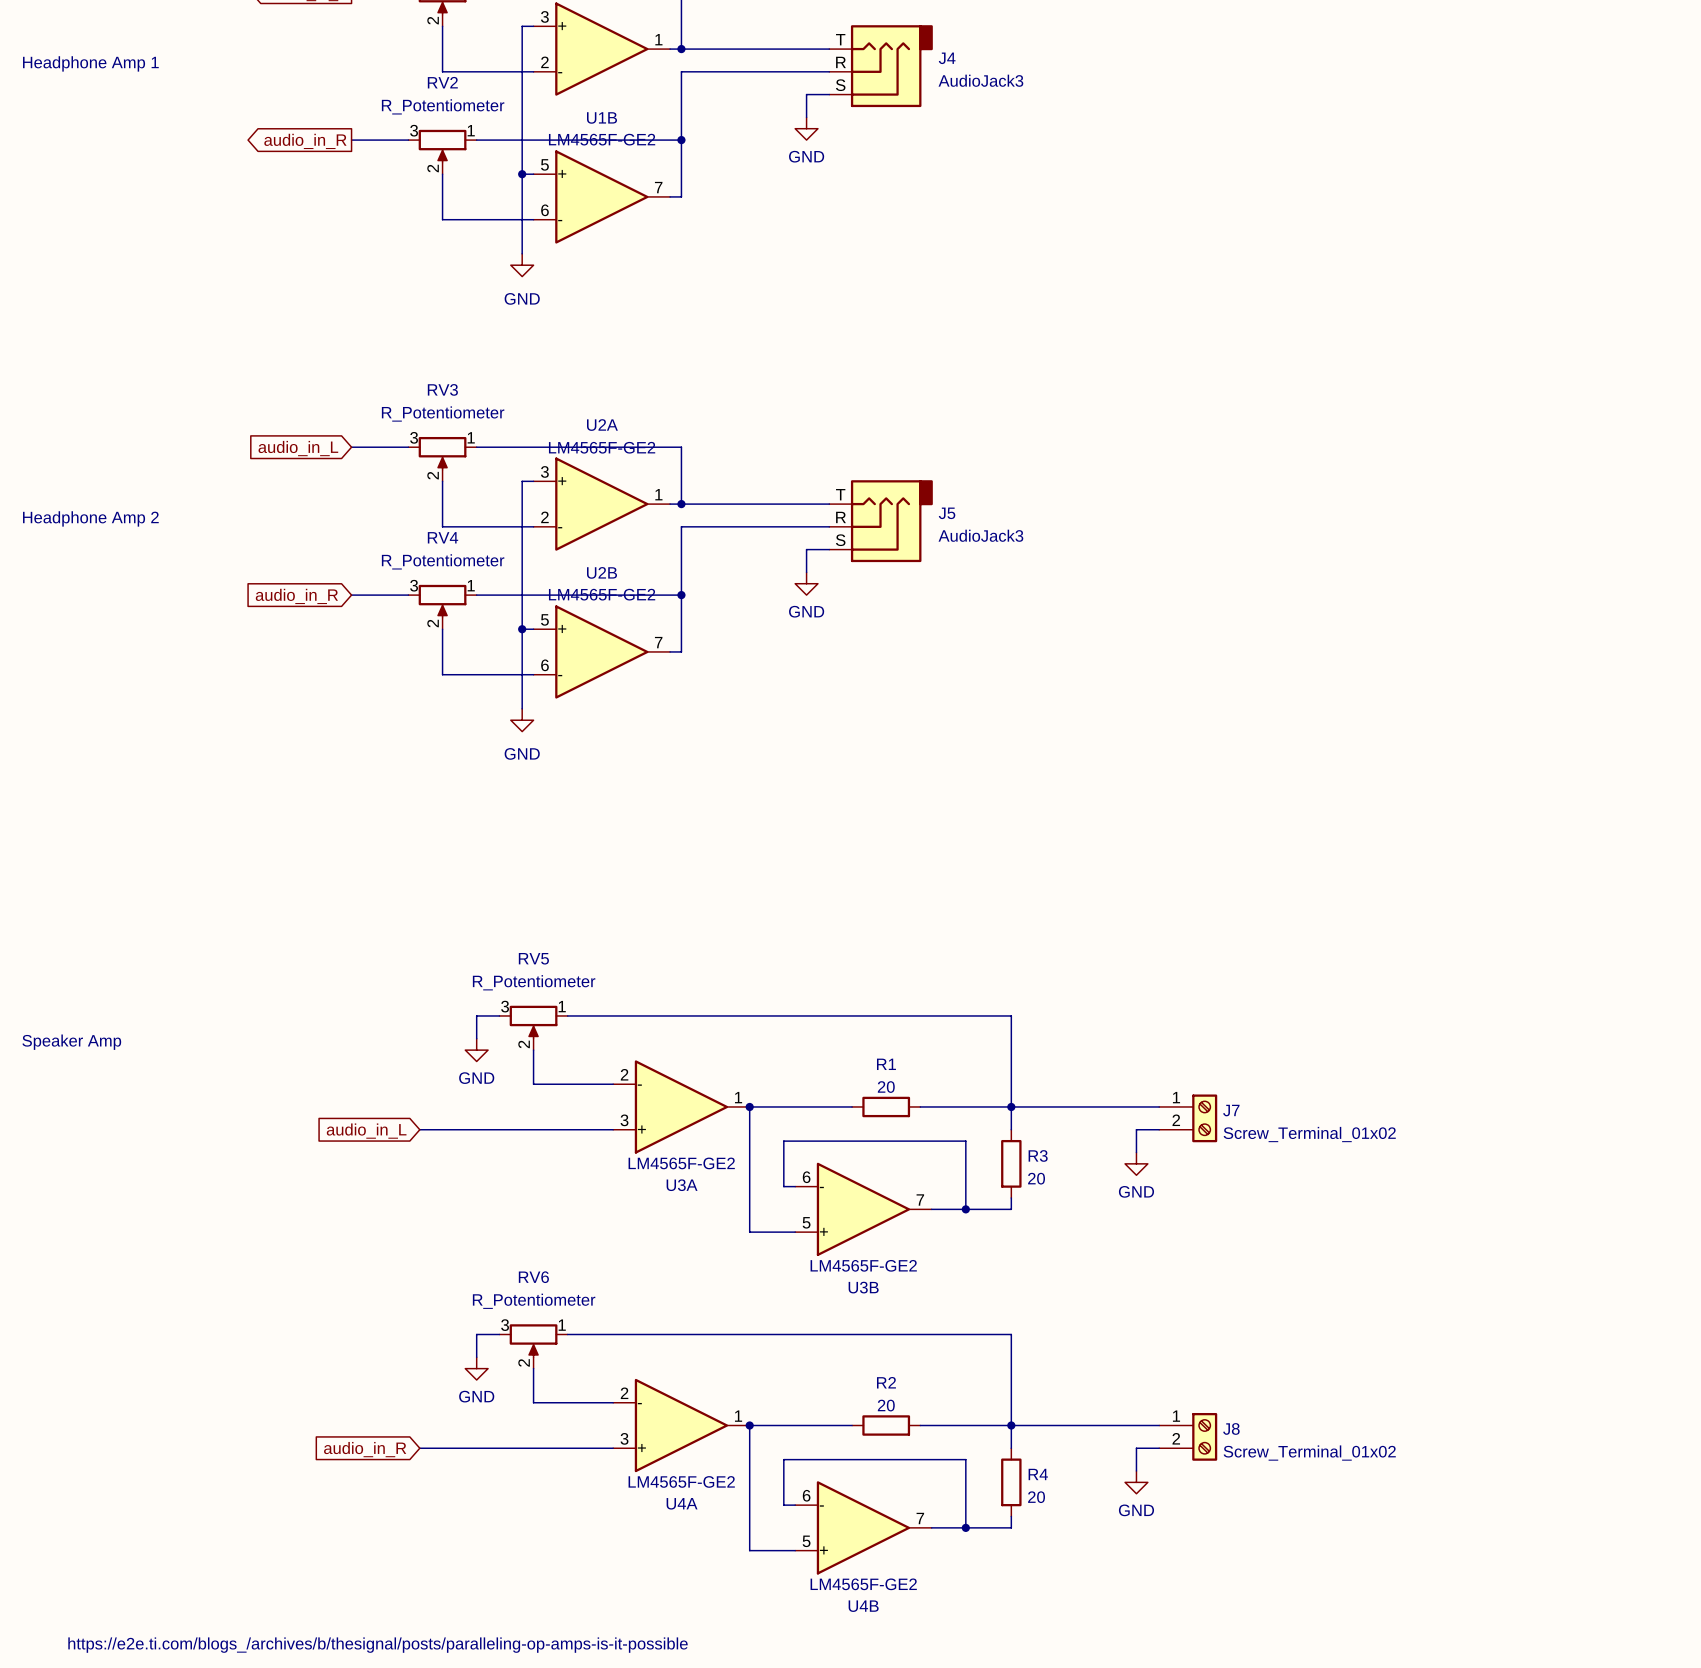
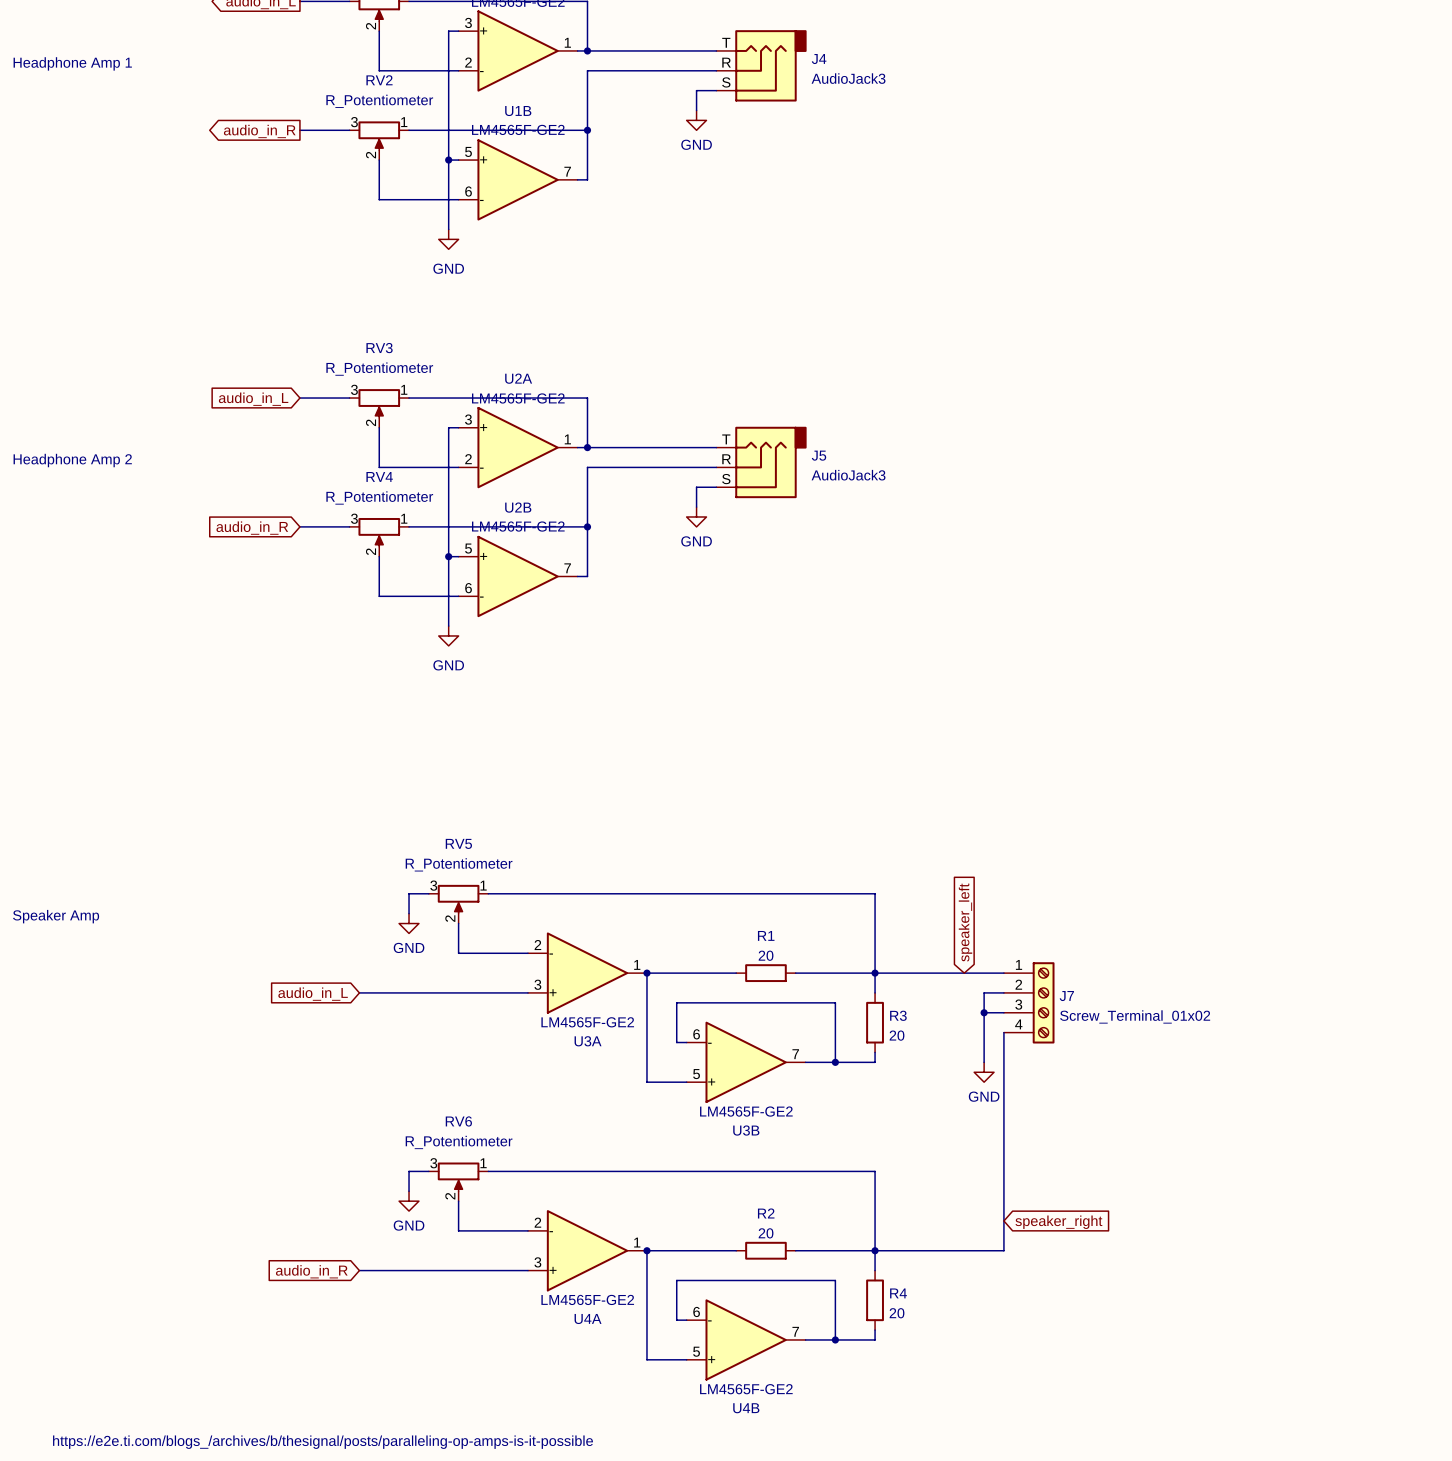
global label: none -> speaker_left (965, 922)
J7 symbol: [1159, 1094, 1218, 1143] -> [1003, 962, 1055, 1044]
junction: none -> (984, 1012)
wire: none -> (1003, 1012) (984, 1012) (984, 1062)
power symbol position: GND (1136, 1163) -> GND (984, 1072)
wire: none -> (1003, 1032) (1003, 1250)
global label: none -> speaker_right (1058, 1222)
J8: Screw_Terminal_01x02 (1188, 1436) -> none
wire: (1159, 1448) (1136, 1448) (1136, 1471) -> none
power symbol: GND (1136, 1482) -> none

